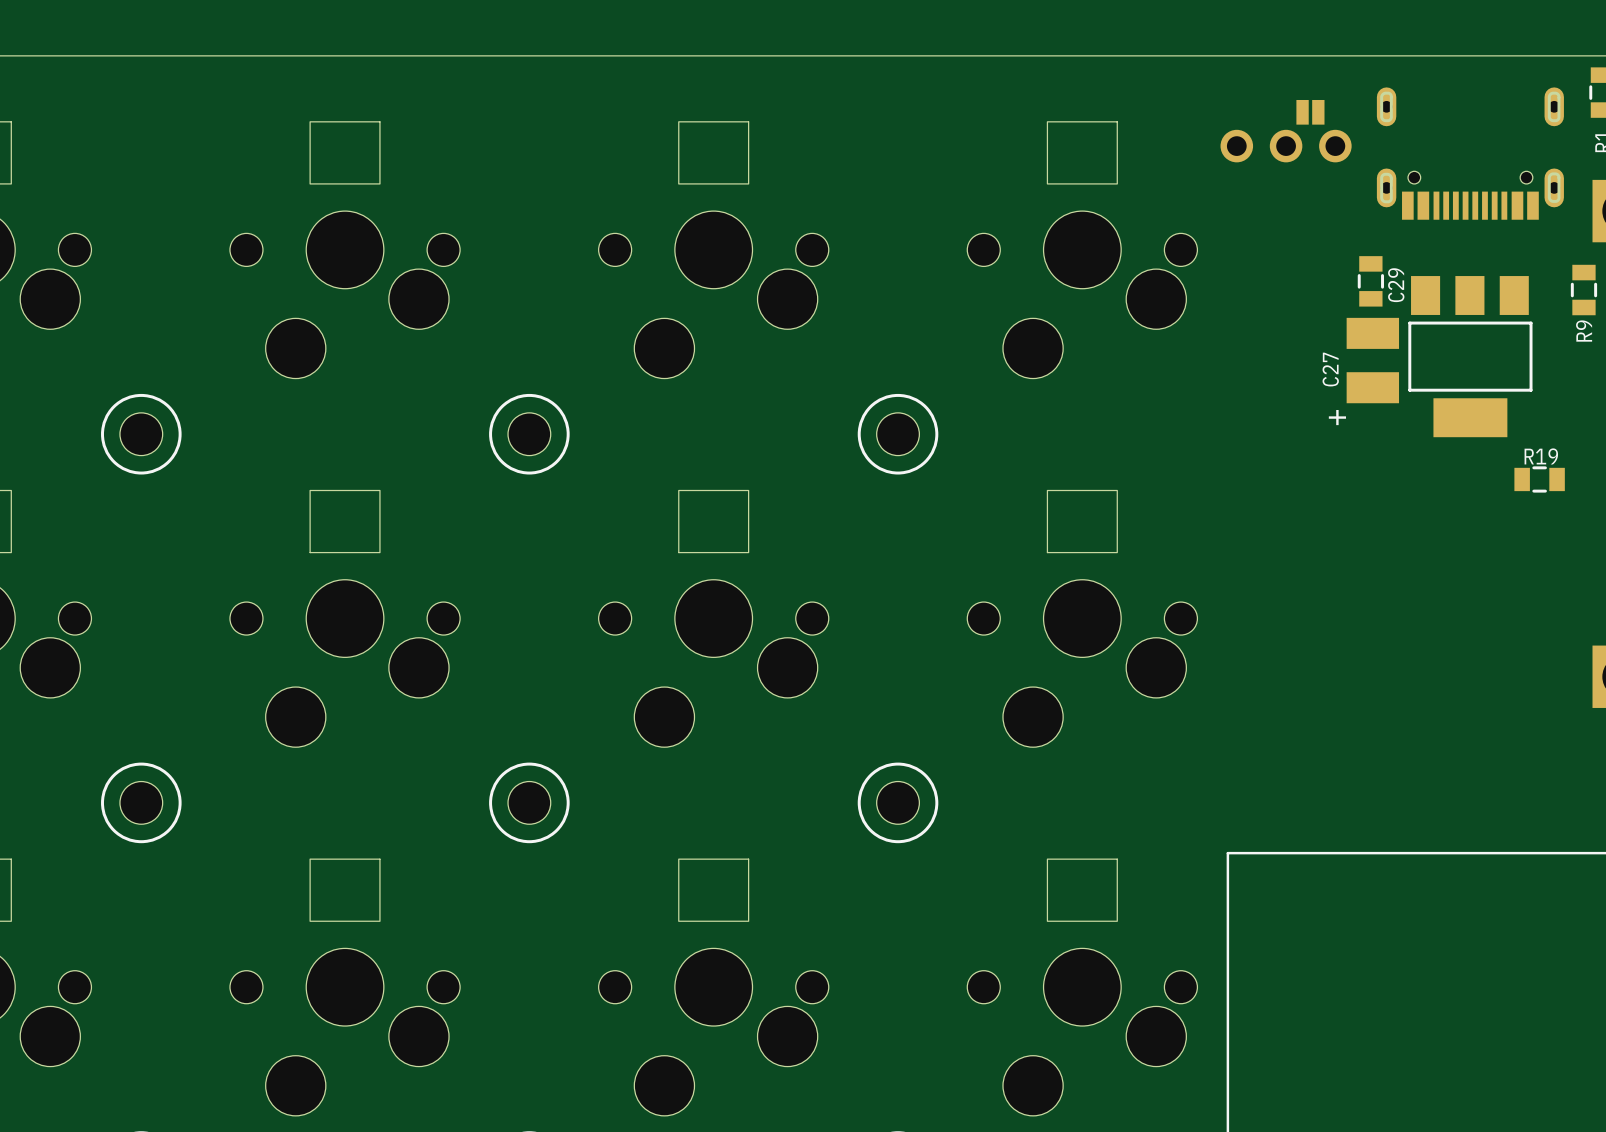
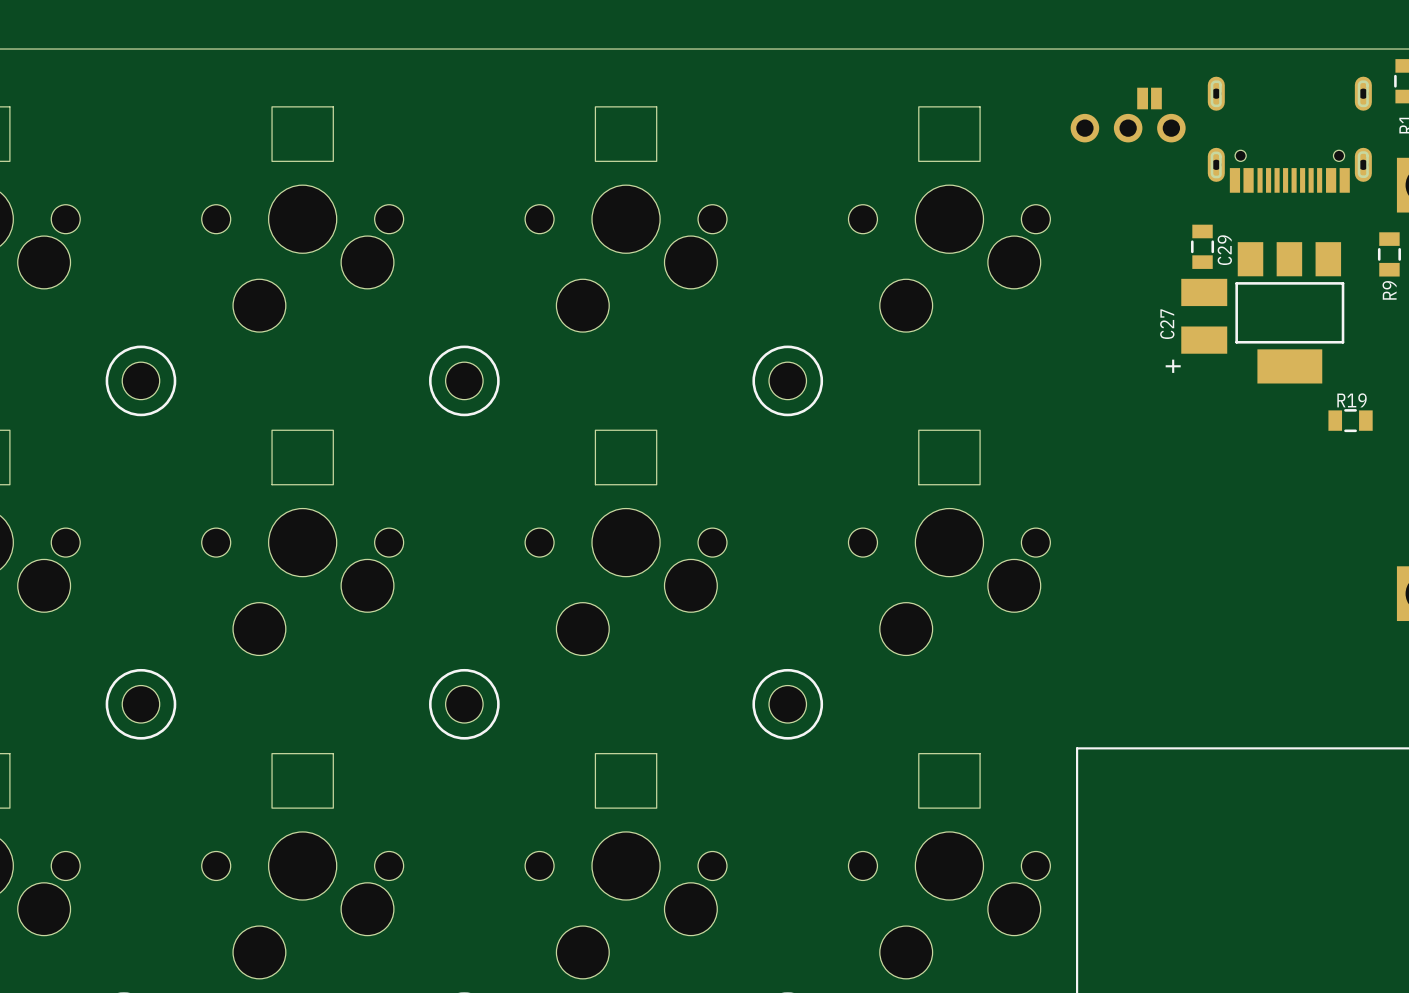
part position: (141, 434) -> (140, 380)
part position: (141, 802) -> (140, 704)

